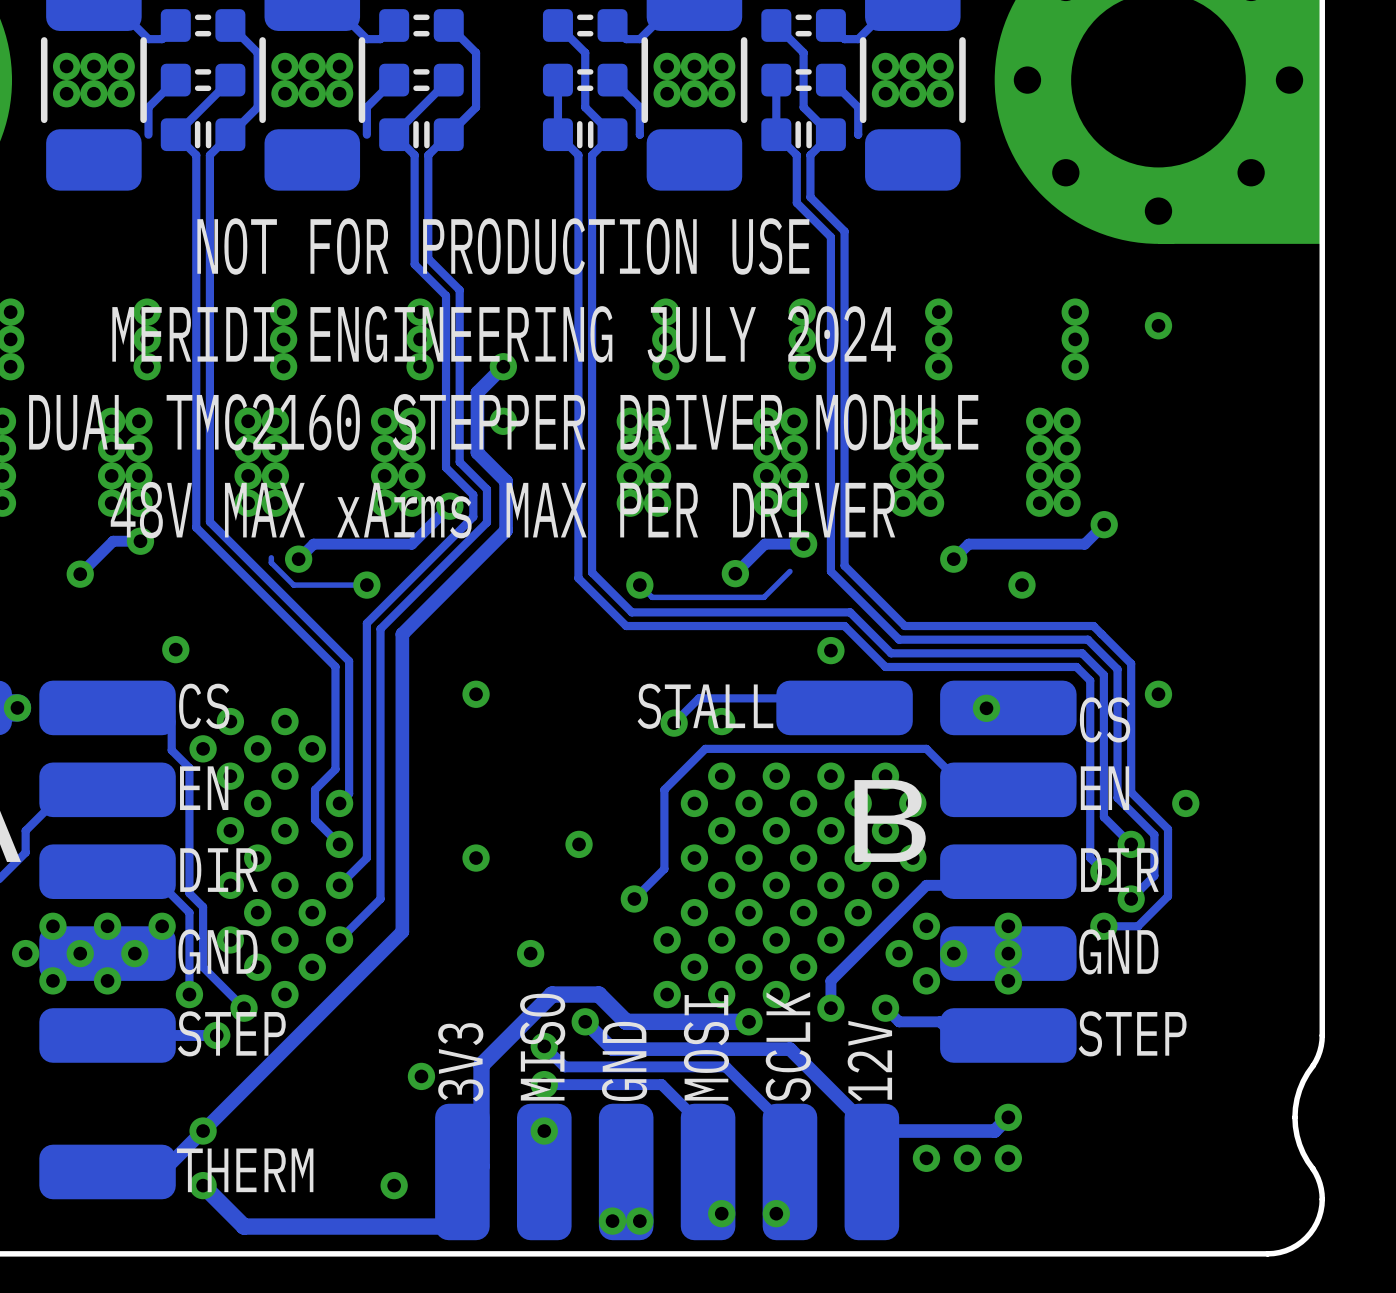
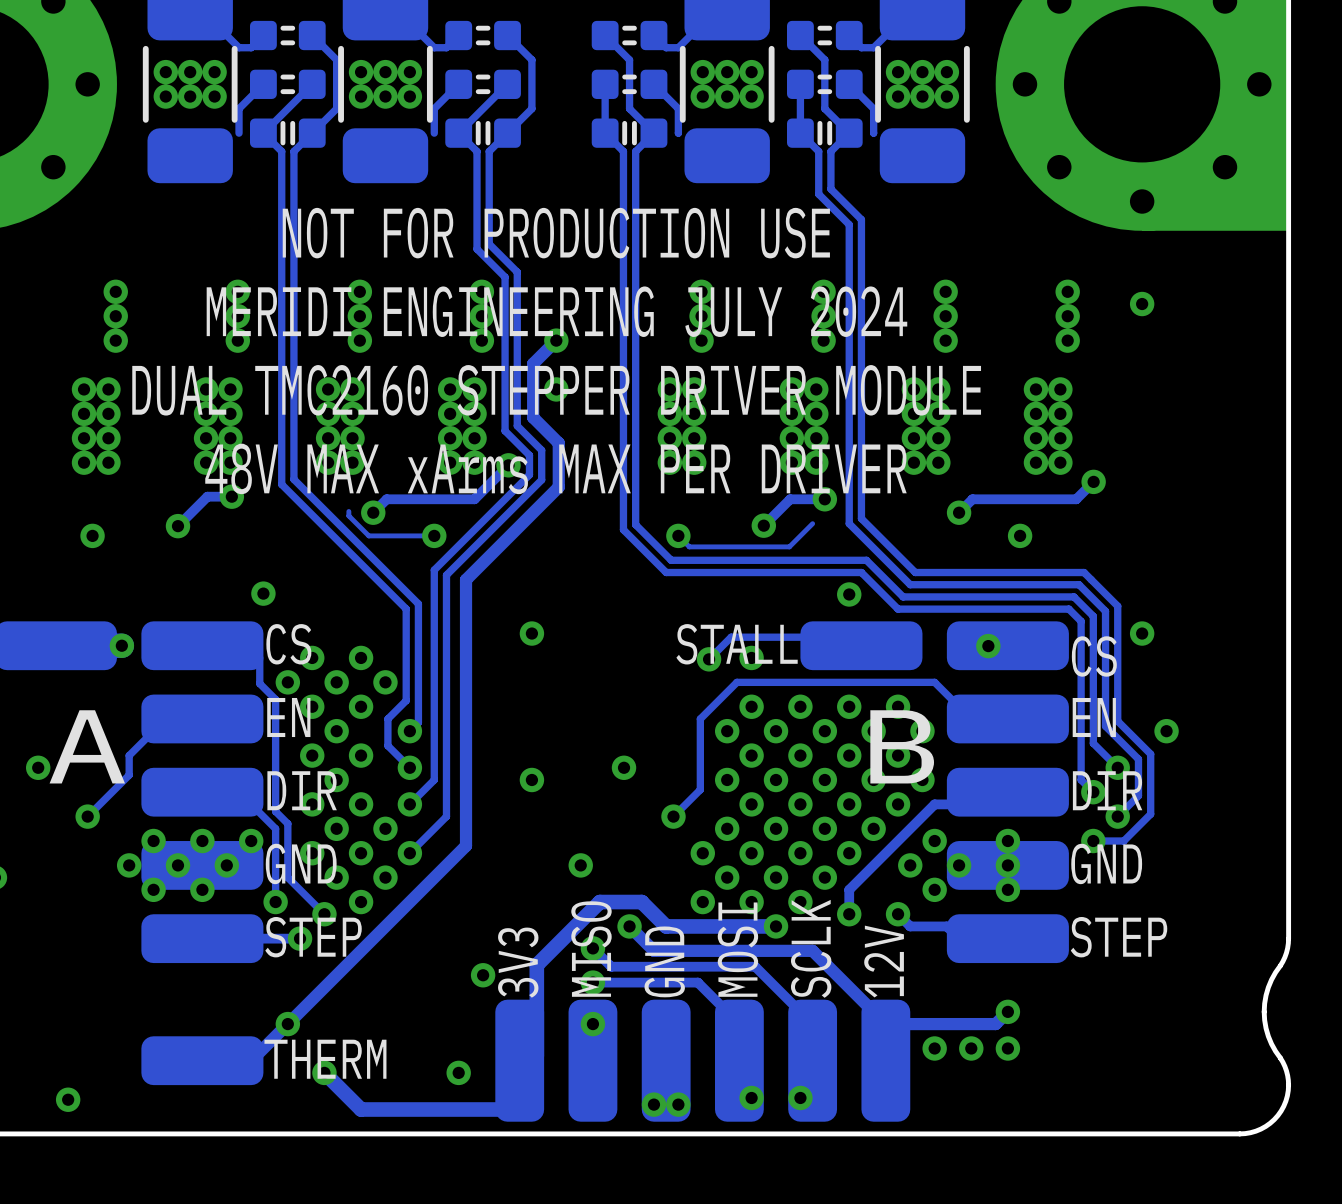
track: (203, 1185) (244, 1226) (284, 1226) -> (324, 1072) (361, 1109)
via position: (203, 1185) -> (324, 1072)

